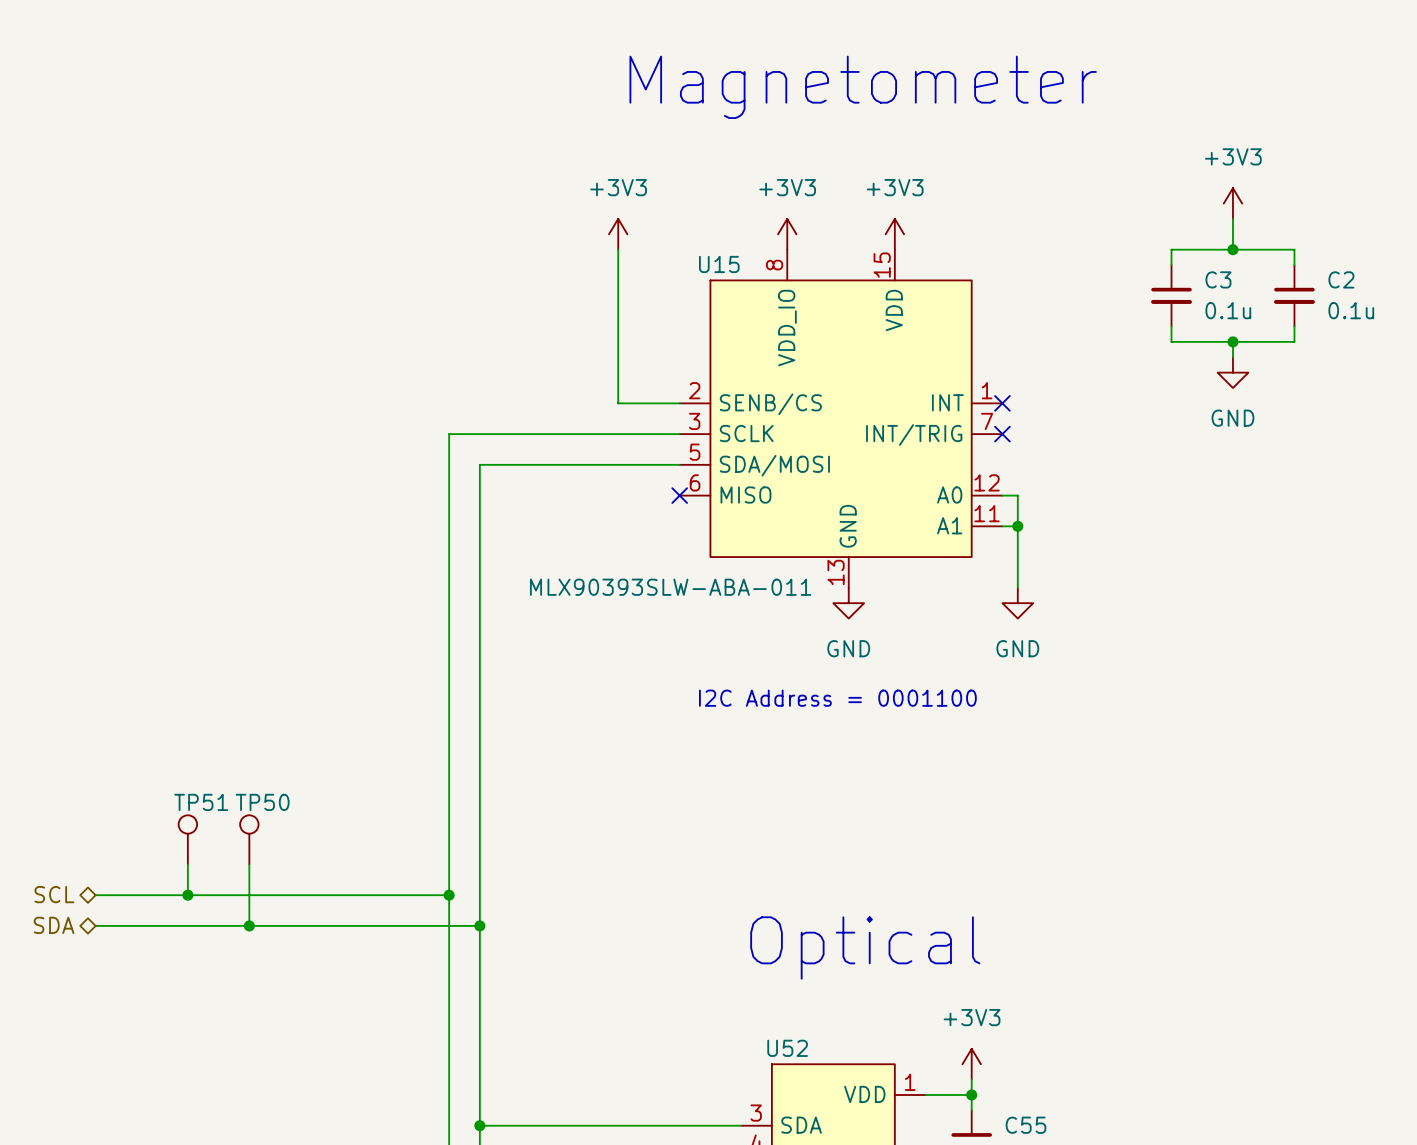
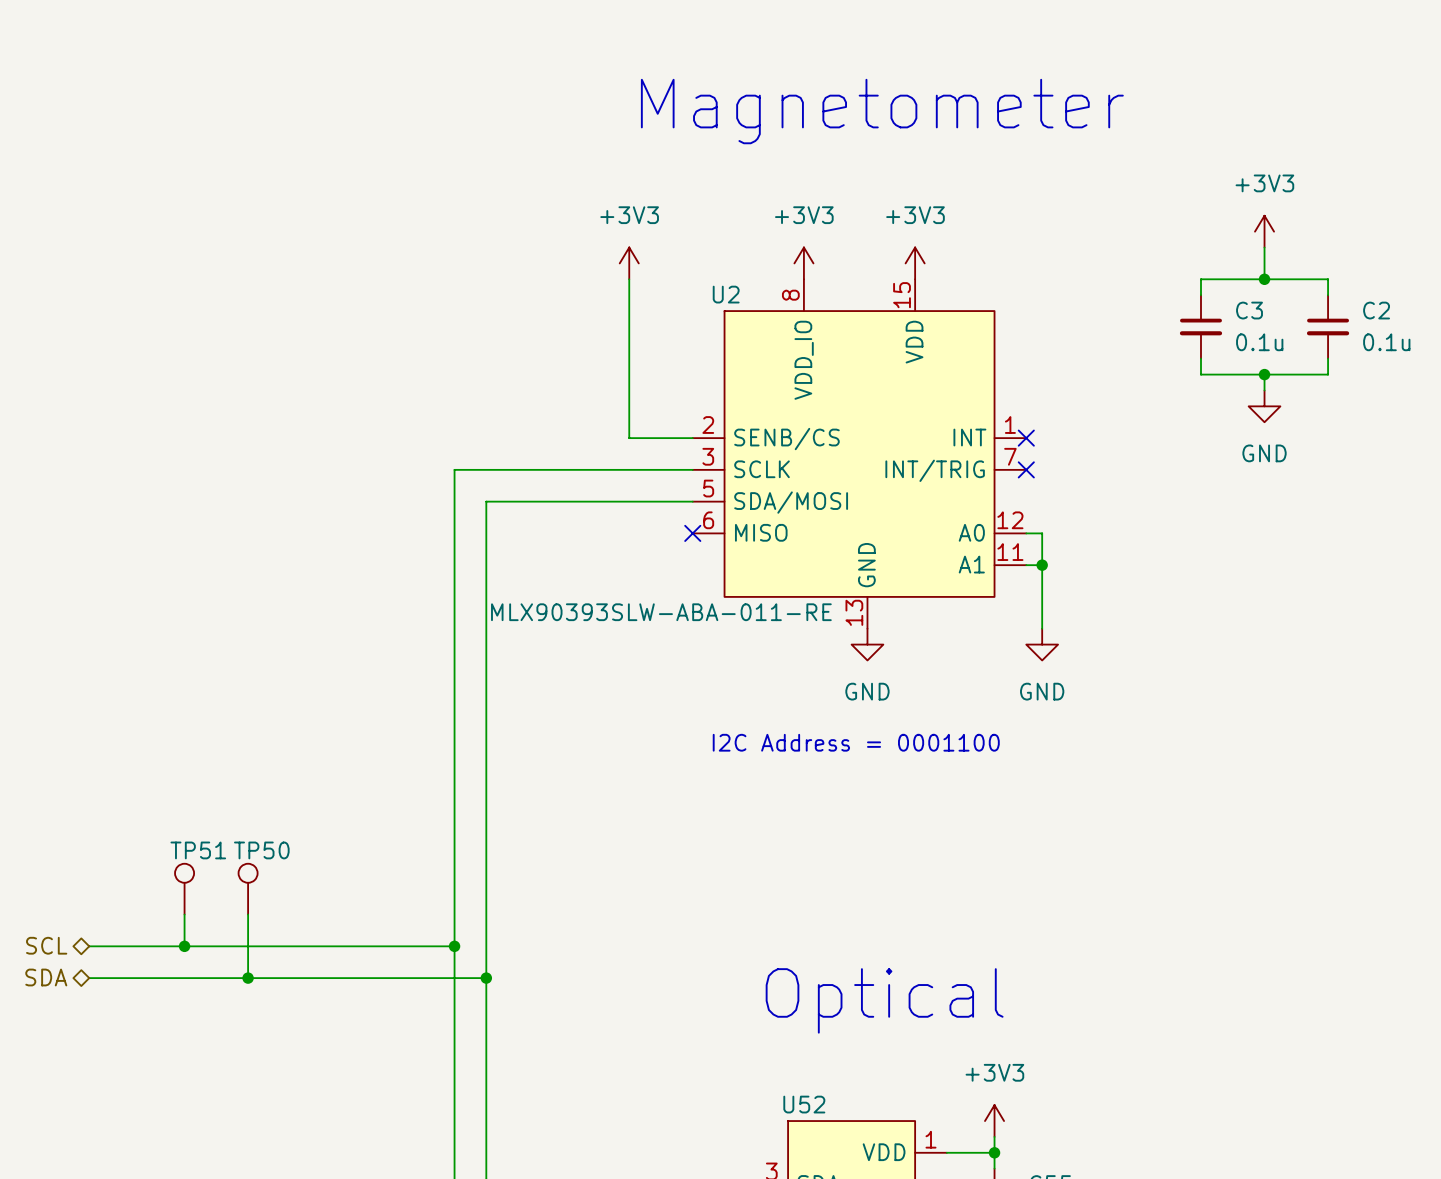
U15 name: U15 (719, 264) -> U2 (726, 294)
U15 value: MLX90393SLW-ABA-011 (670, 587) -> MLX90393SLW-ABA-011-RE (661, 612)

